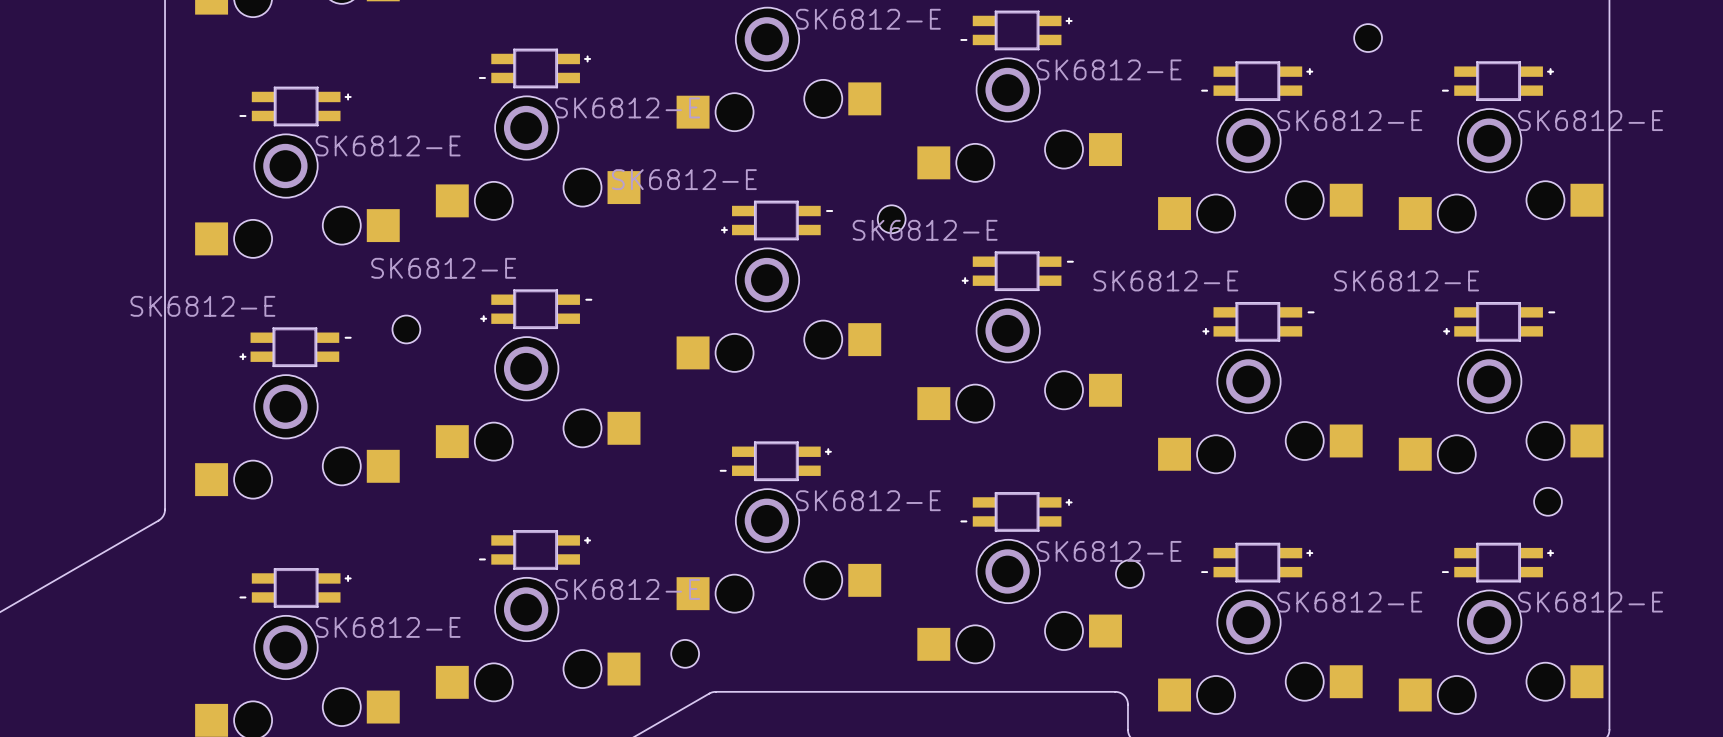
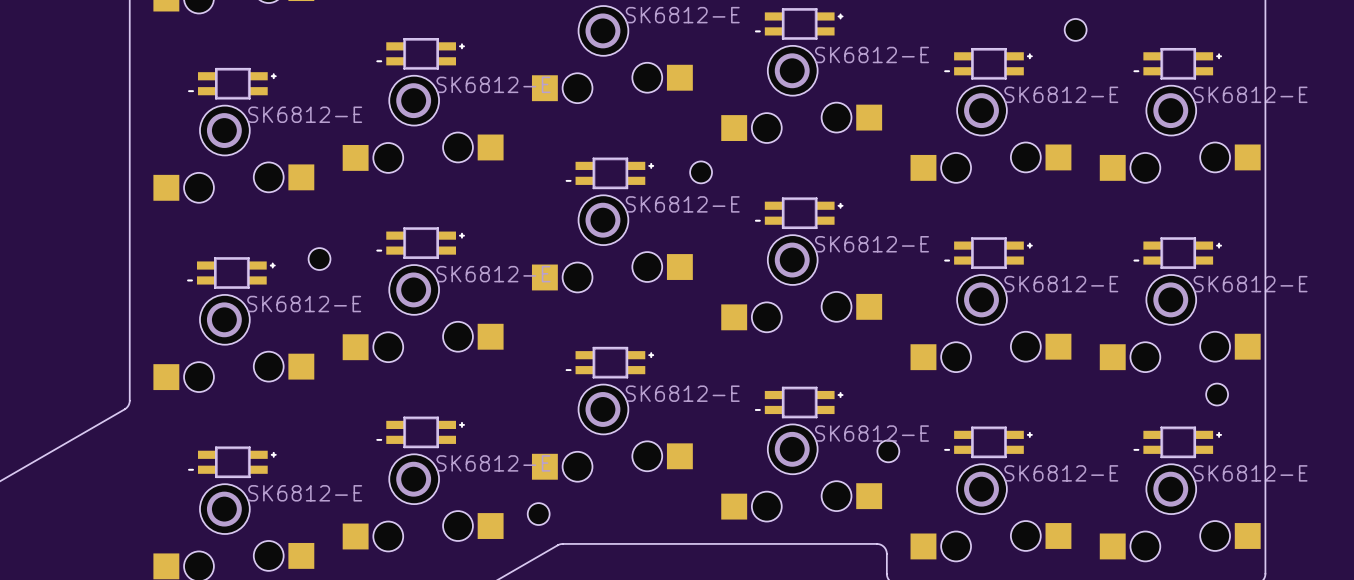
part rotation: 0° (777, 220) -> 180° (609, 173)
part rotation: 0° (1017, 271) -> 180° (799, 213)
part rotation: 0° (536, 309) -> 180° (420, 243)
part rotation: 0° (1258, 321) -> 180° (988, 253)
part rotation: 0° (1499, 321) -> 180° (1177, 253)
part rotation: 0° (295, 347) -> 180° (231, 272)

